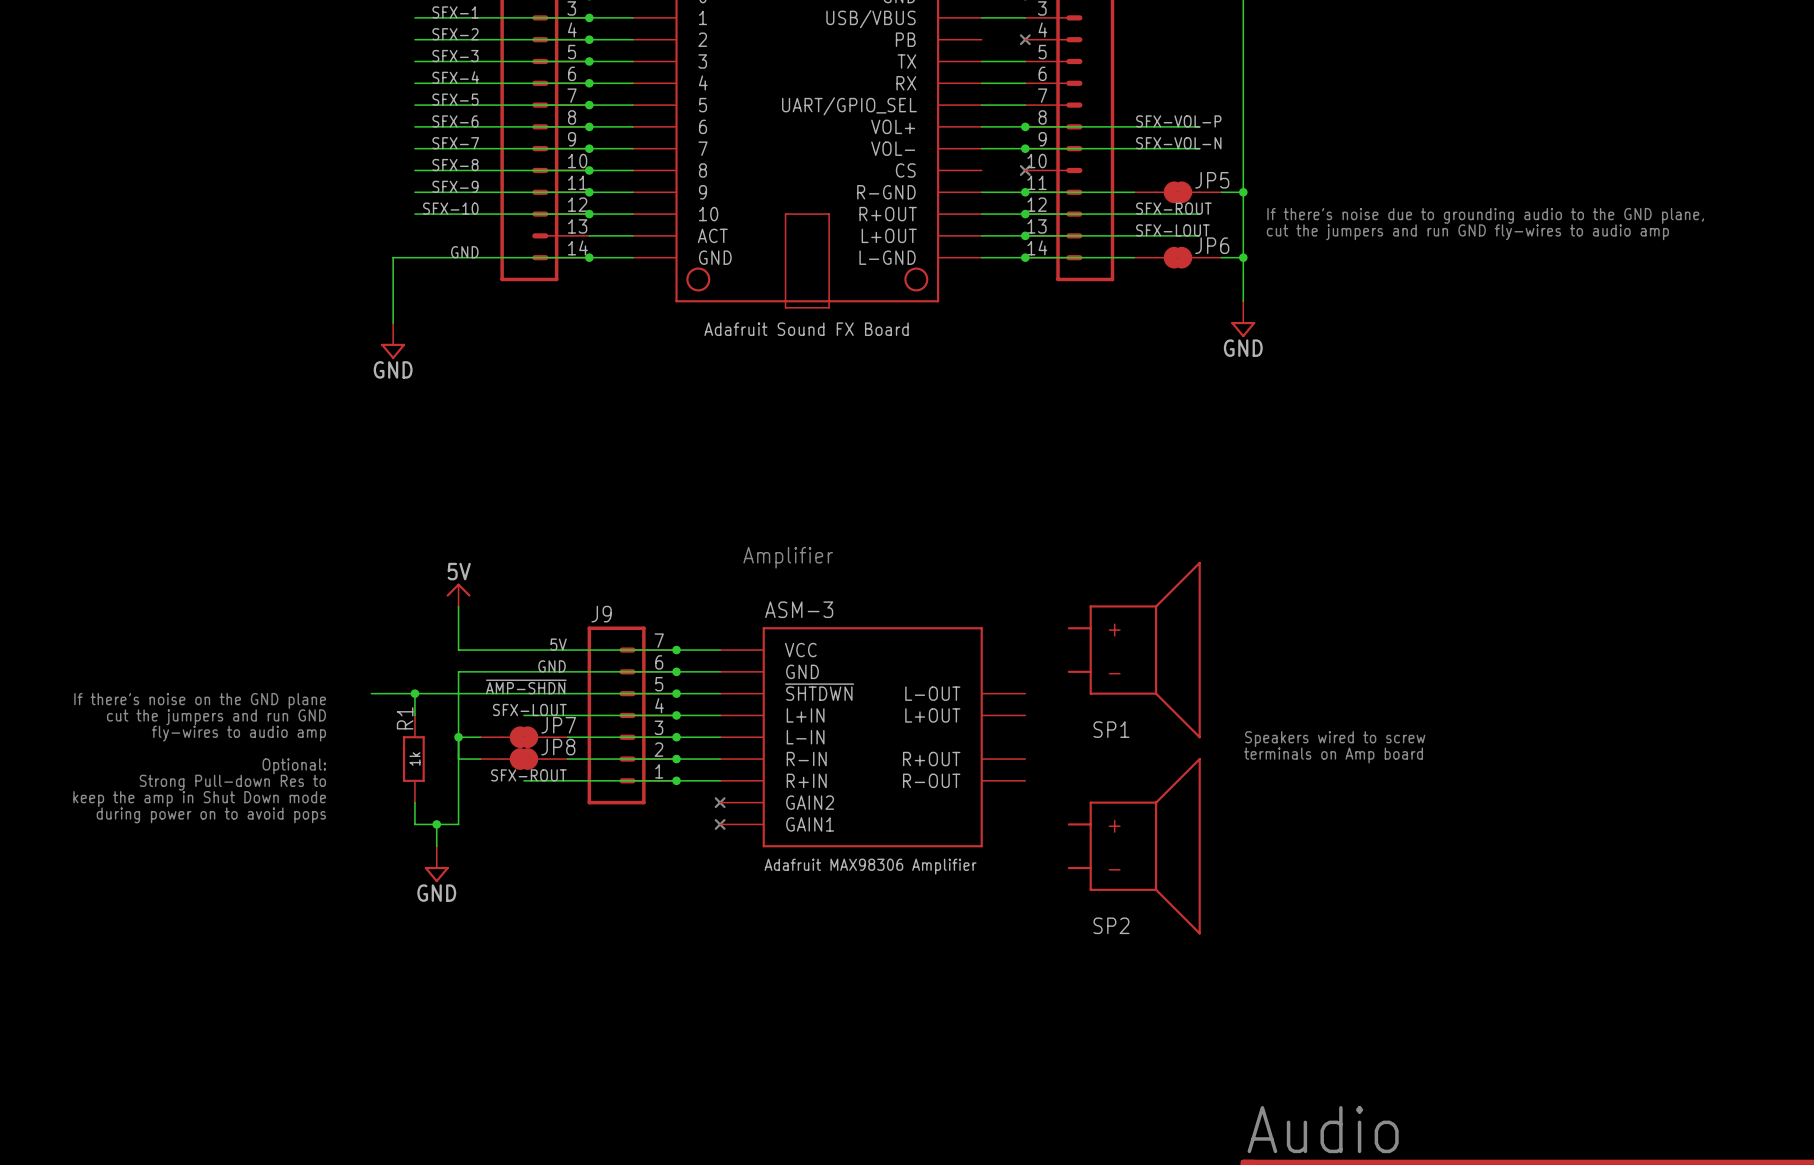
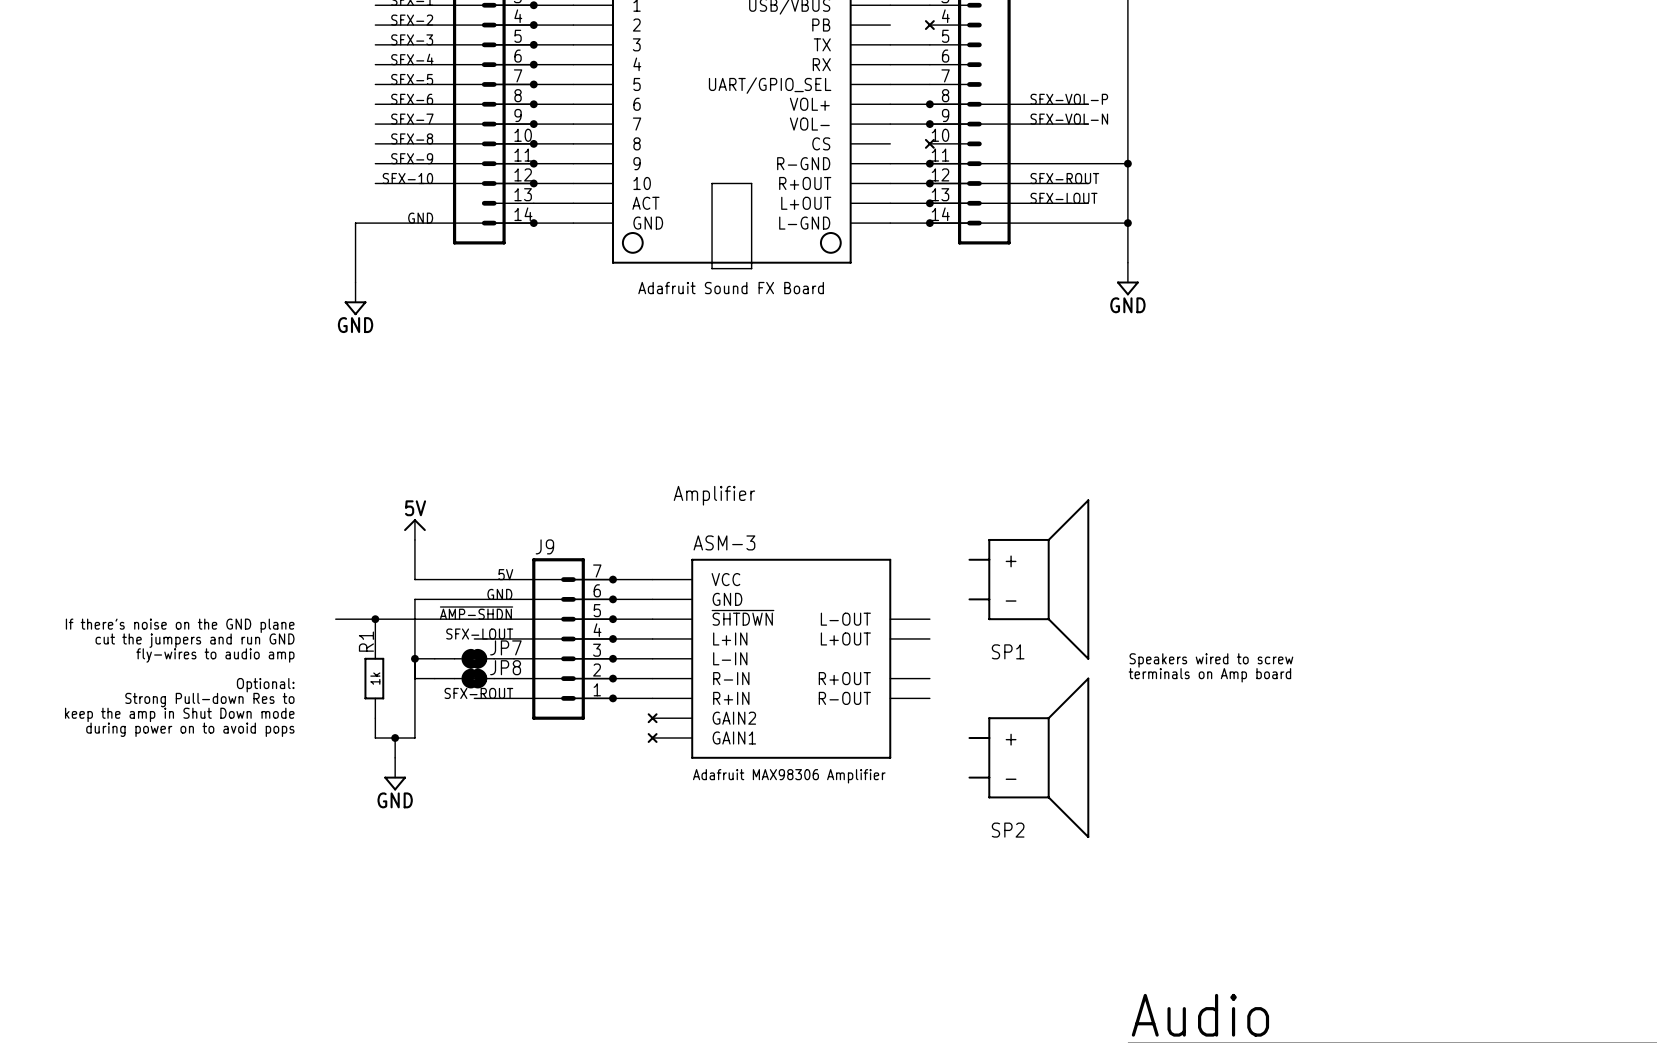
JP5: (1177, 192) -> none
text: If there's noise due to grounding audio to the GND plane, (1485, 215) -> none
text: cut the jumpers and run GND fly-wires to audio amp (1467, 232) -> none
JP6: (1177, 257) -> none

